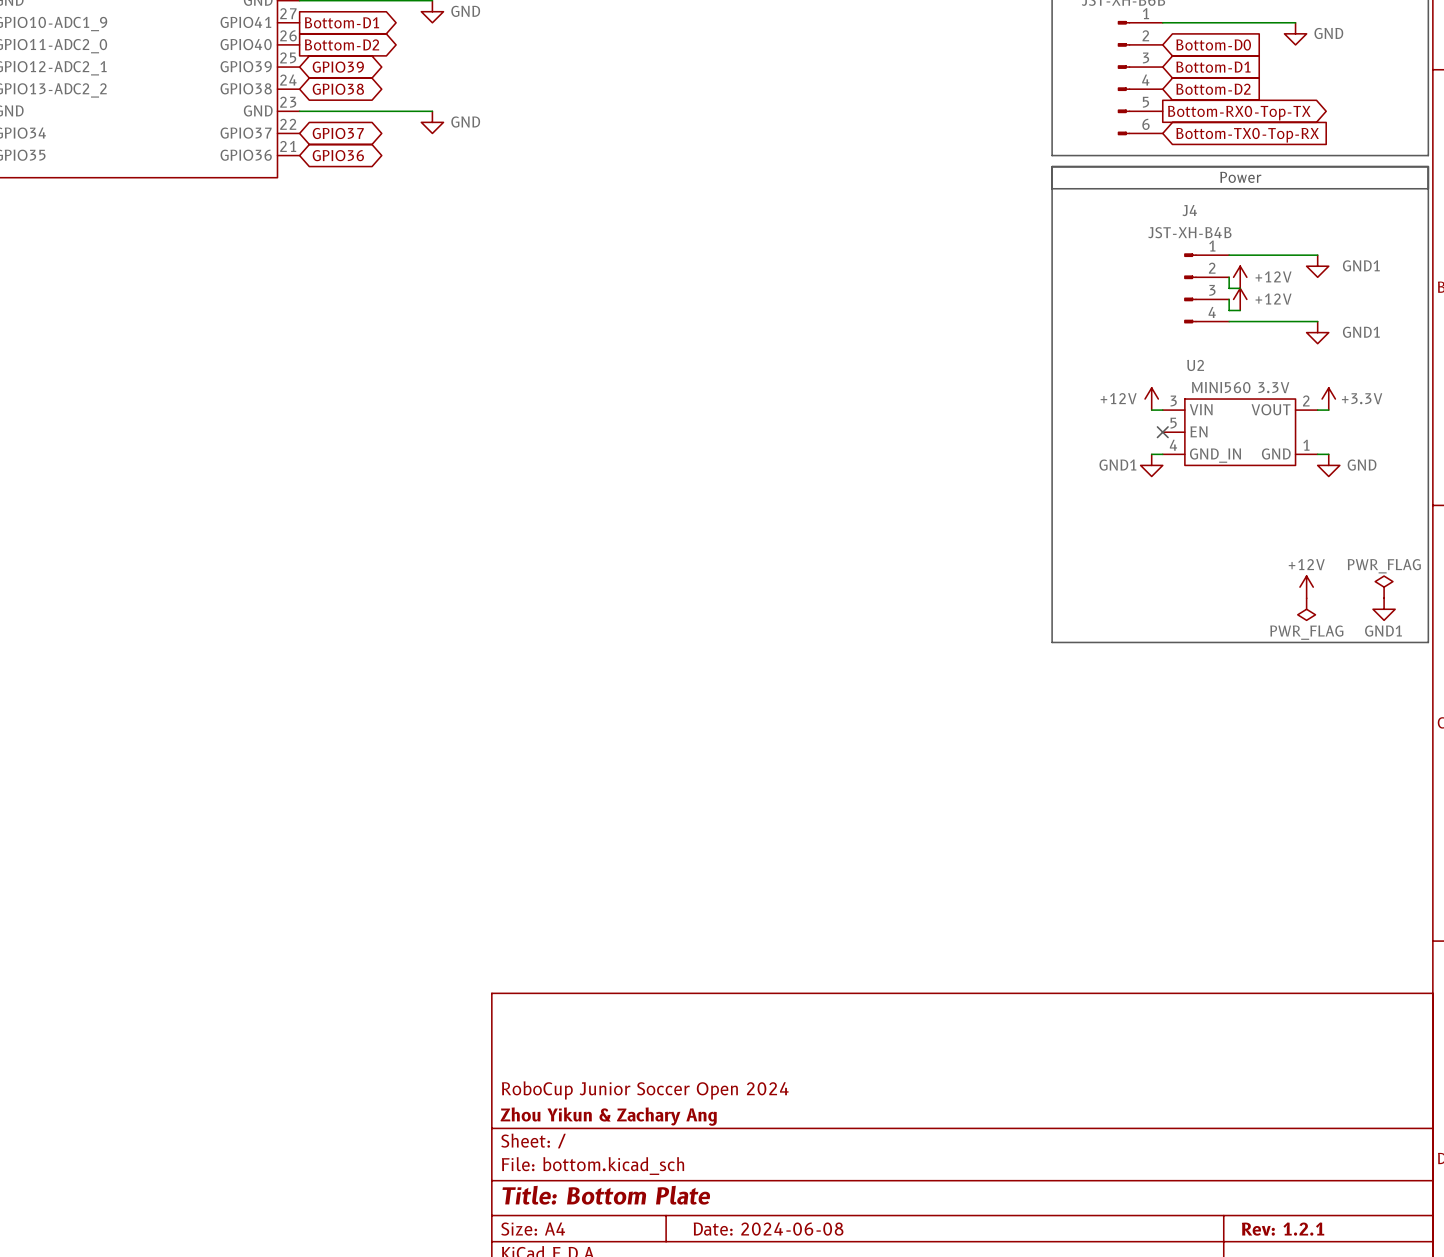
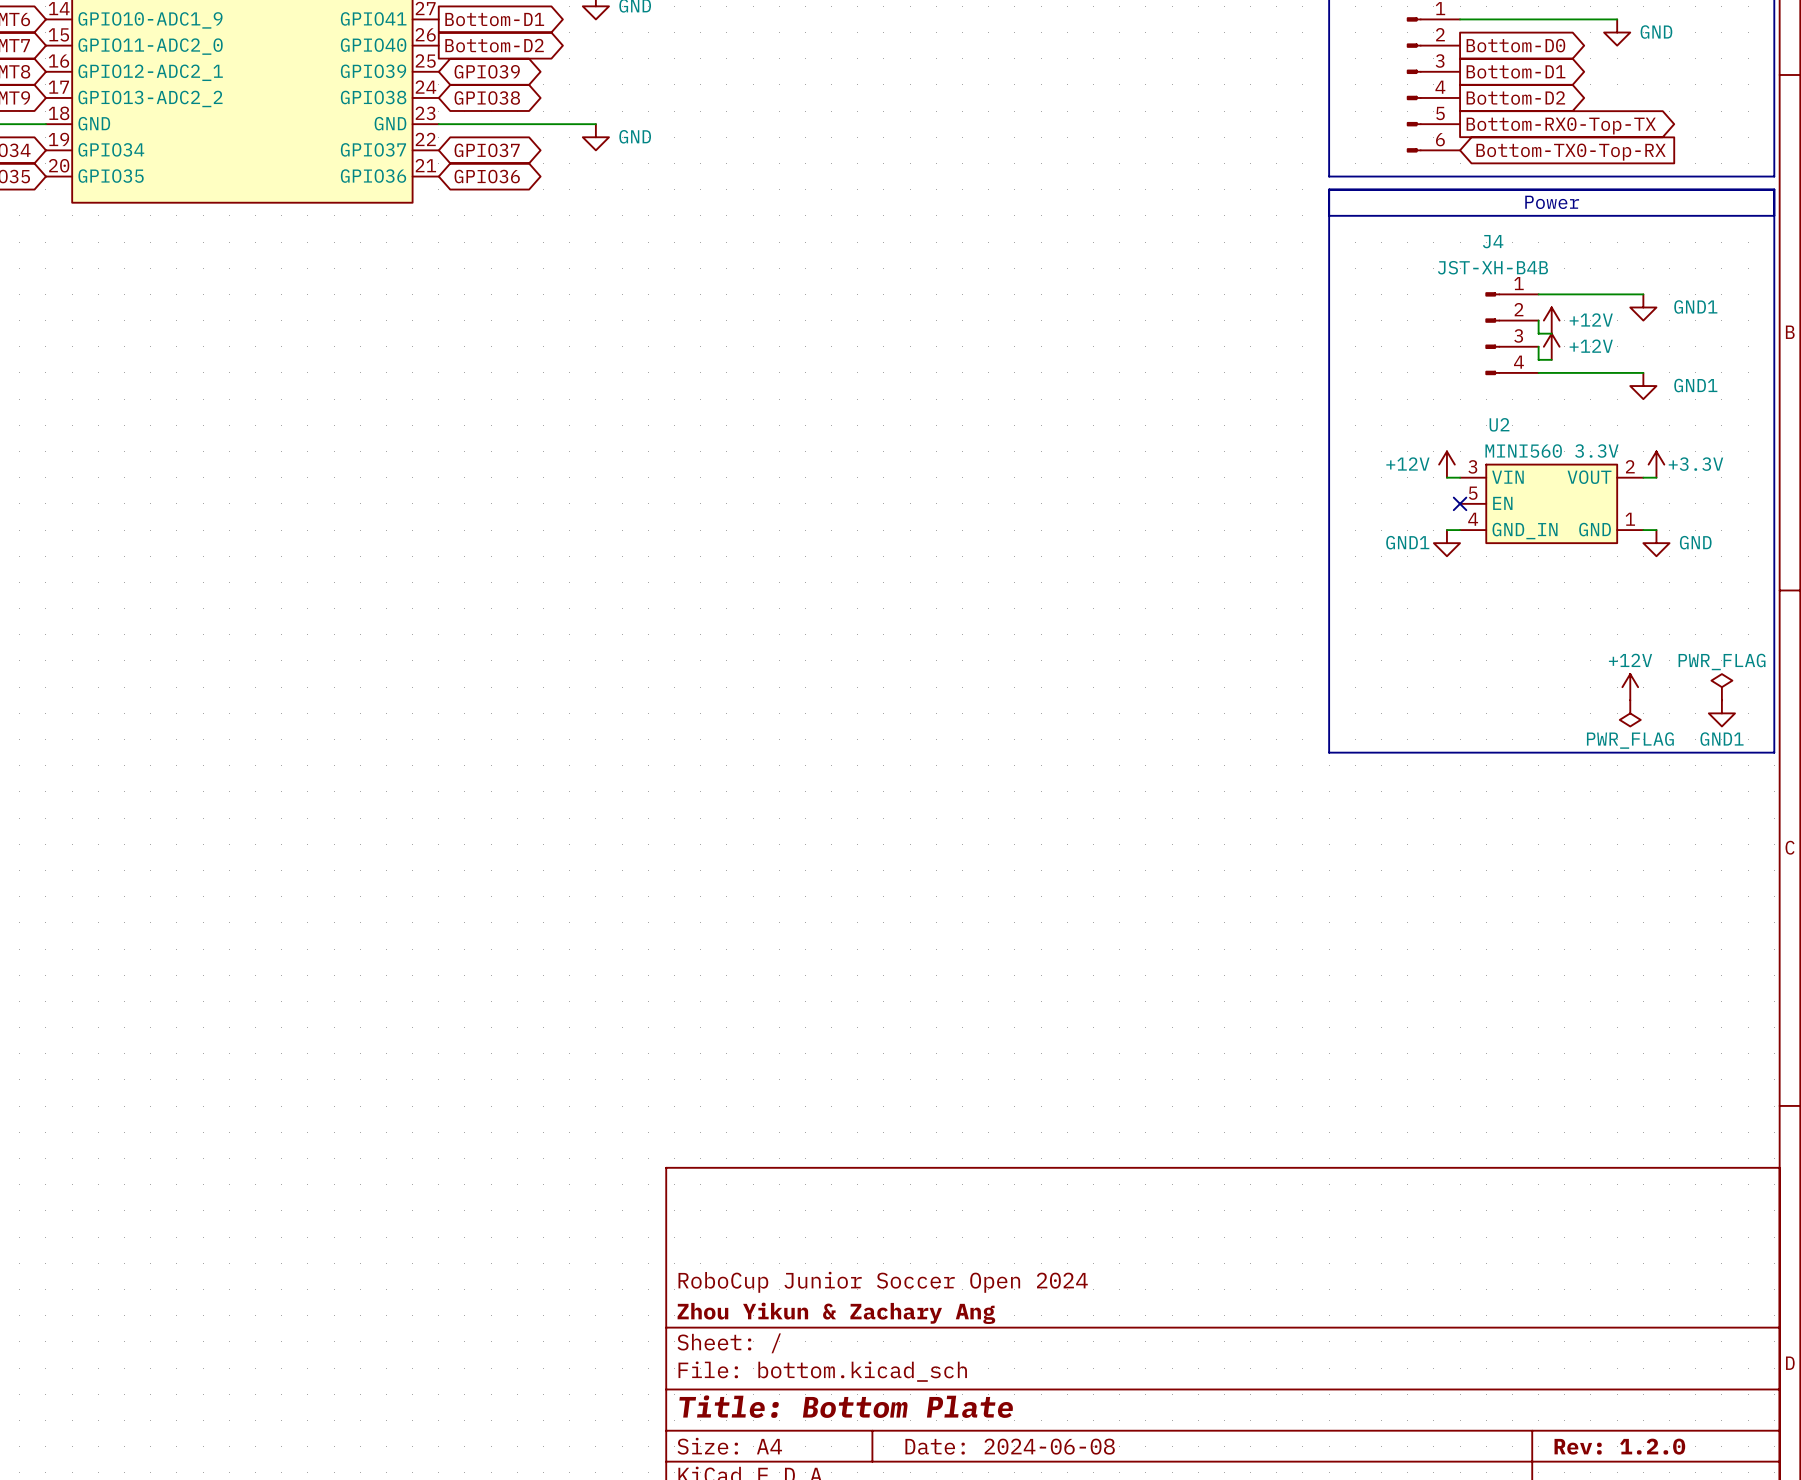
global label shape: input (1213, 44) -> output (1515, 45)
global label shape: input (1213, 67) -> output (1516, 71)
global label shape: input (1213, 89) -> output (1515, 97)
title block: Rev: 1.2.1 (1283, 1229) -> Rev: 1.2.0 (1619, 1446)

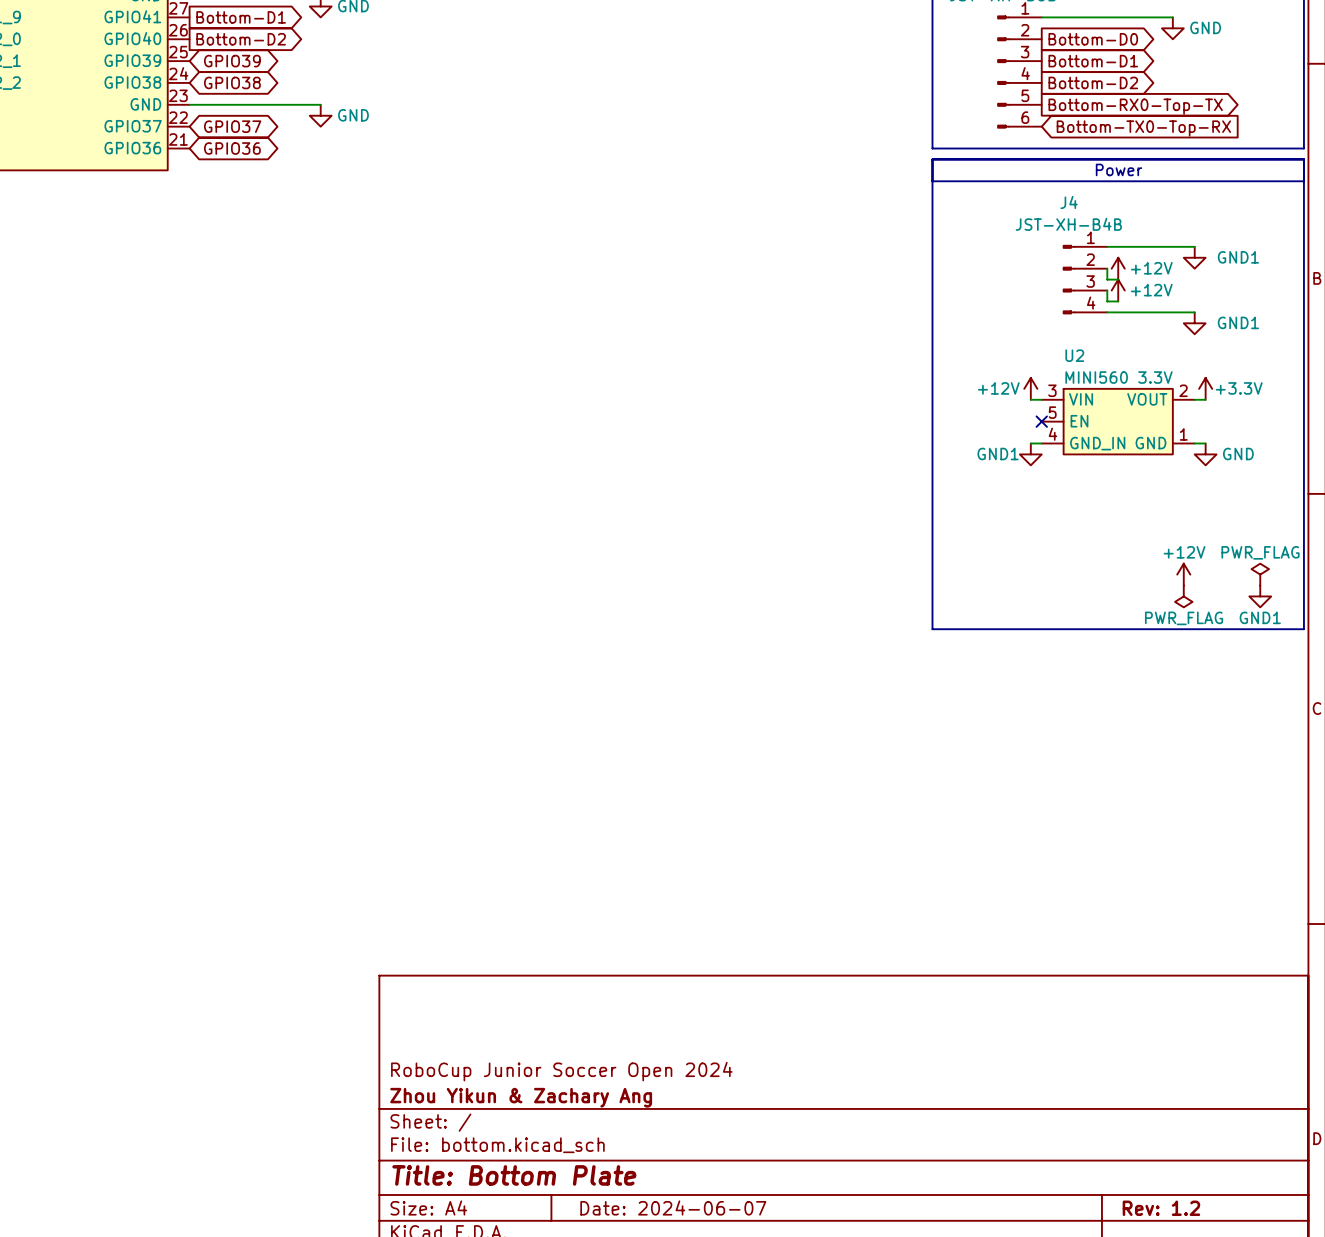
title block: Date: 2024-06-08 (1010, 1446) -> Date: 2024-06-07 (673, 1207)
title block: Rev: 1.2.0 (1619, 1446) -> Rev: 1.2 (1161, 1208)

